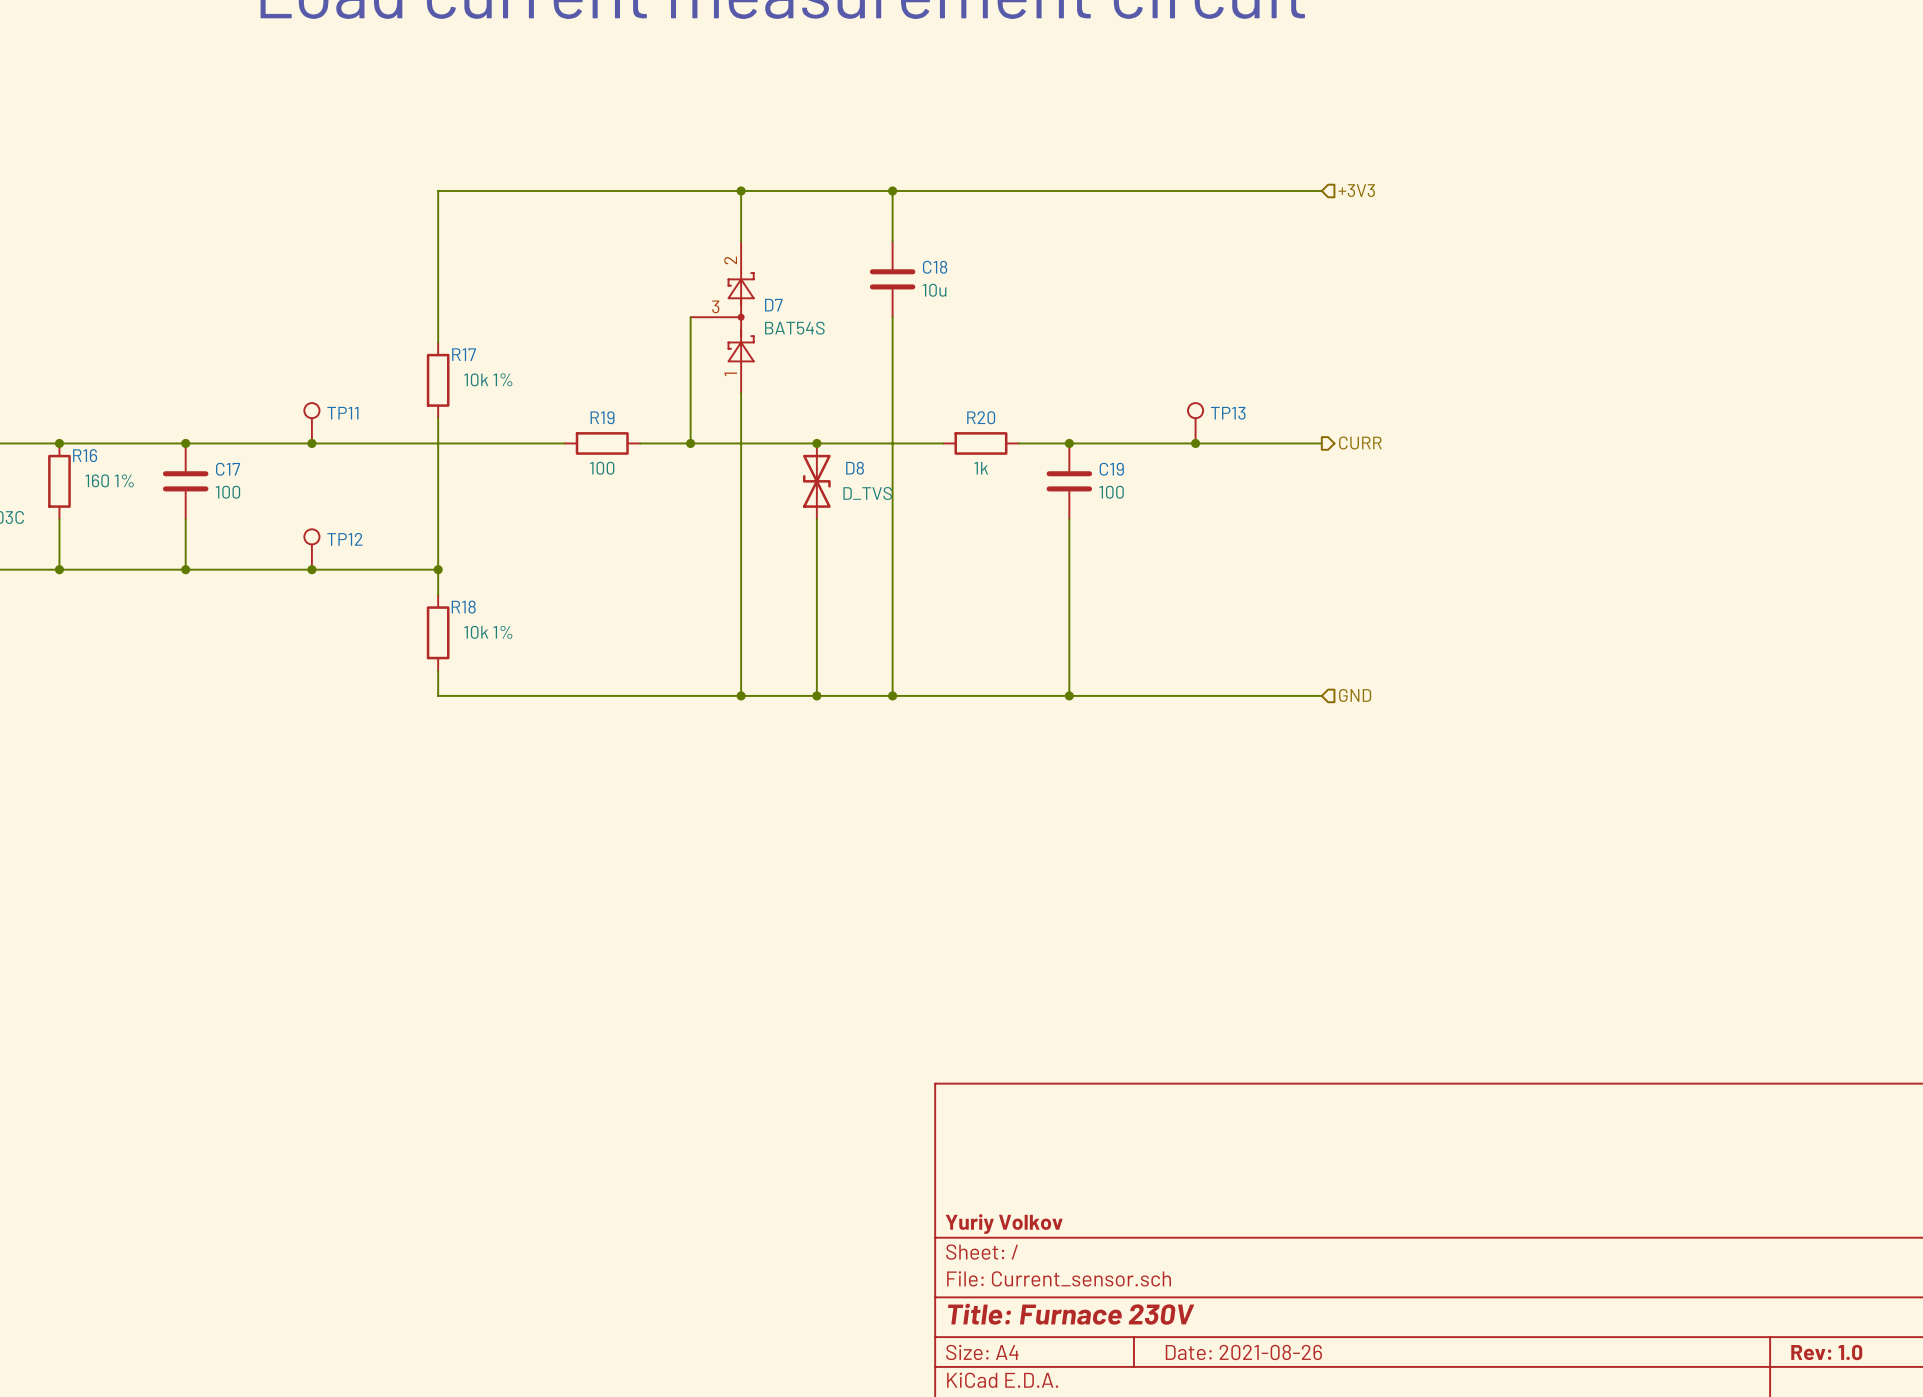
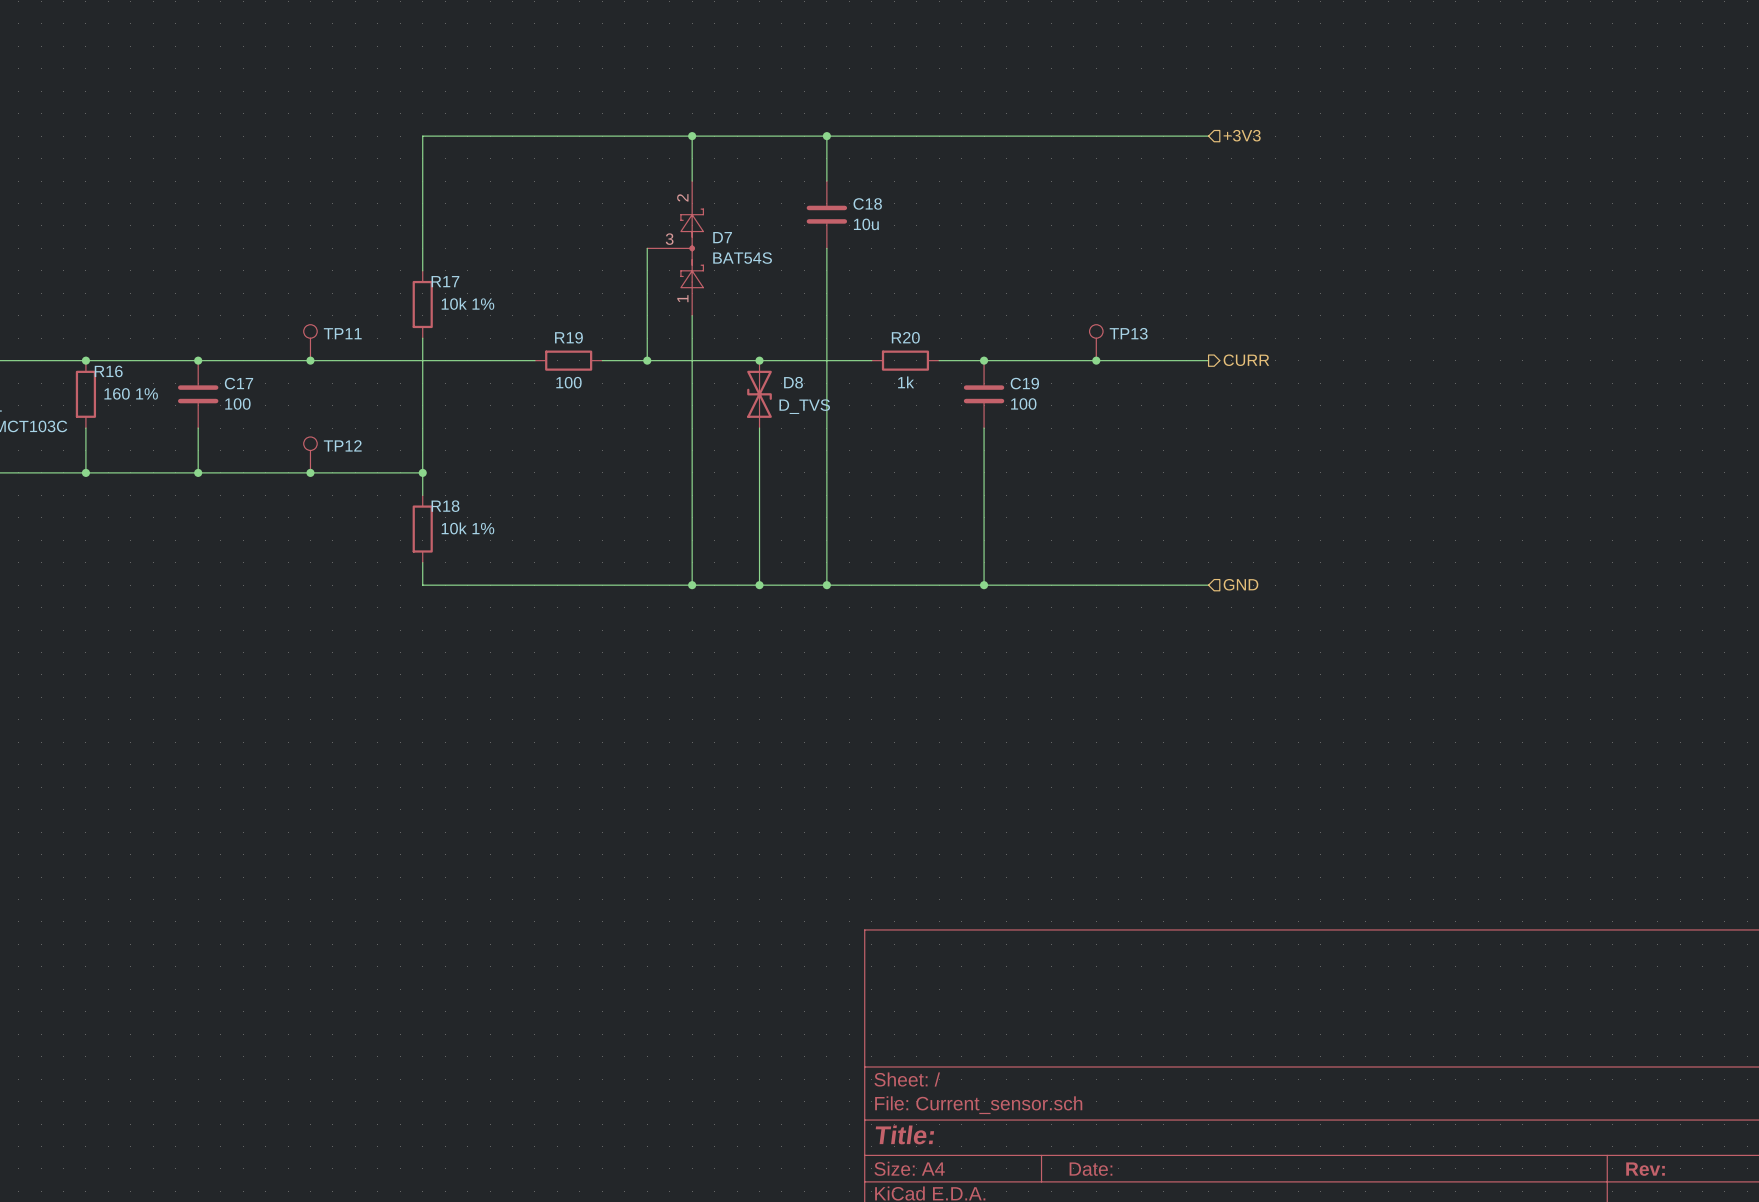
title block: Yuriy Volkov (1004, 1224) -> none
title block: Title: Furnace 230V (1071, 1314) -> Title: (904, 1134)
title block: Date: 2021-08-26 (1243, 1352) -> Date: (1090, 1169)
title block: Rev: 1.0 (1826, 1352) -> Rev: (1645, 1169)

